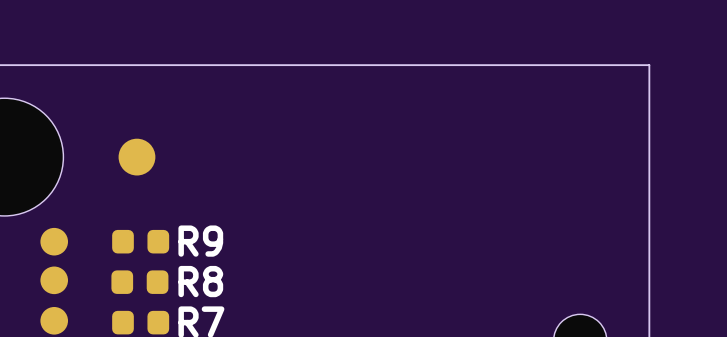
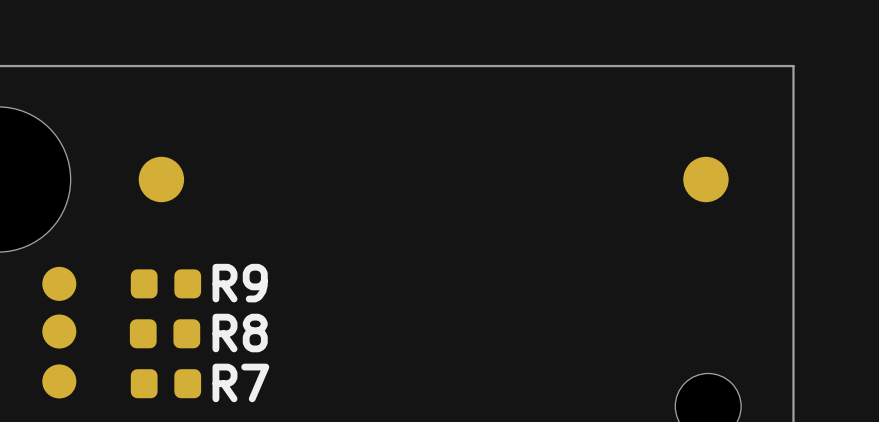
part: none -> (705, 179)

